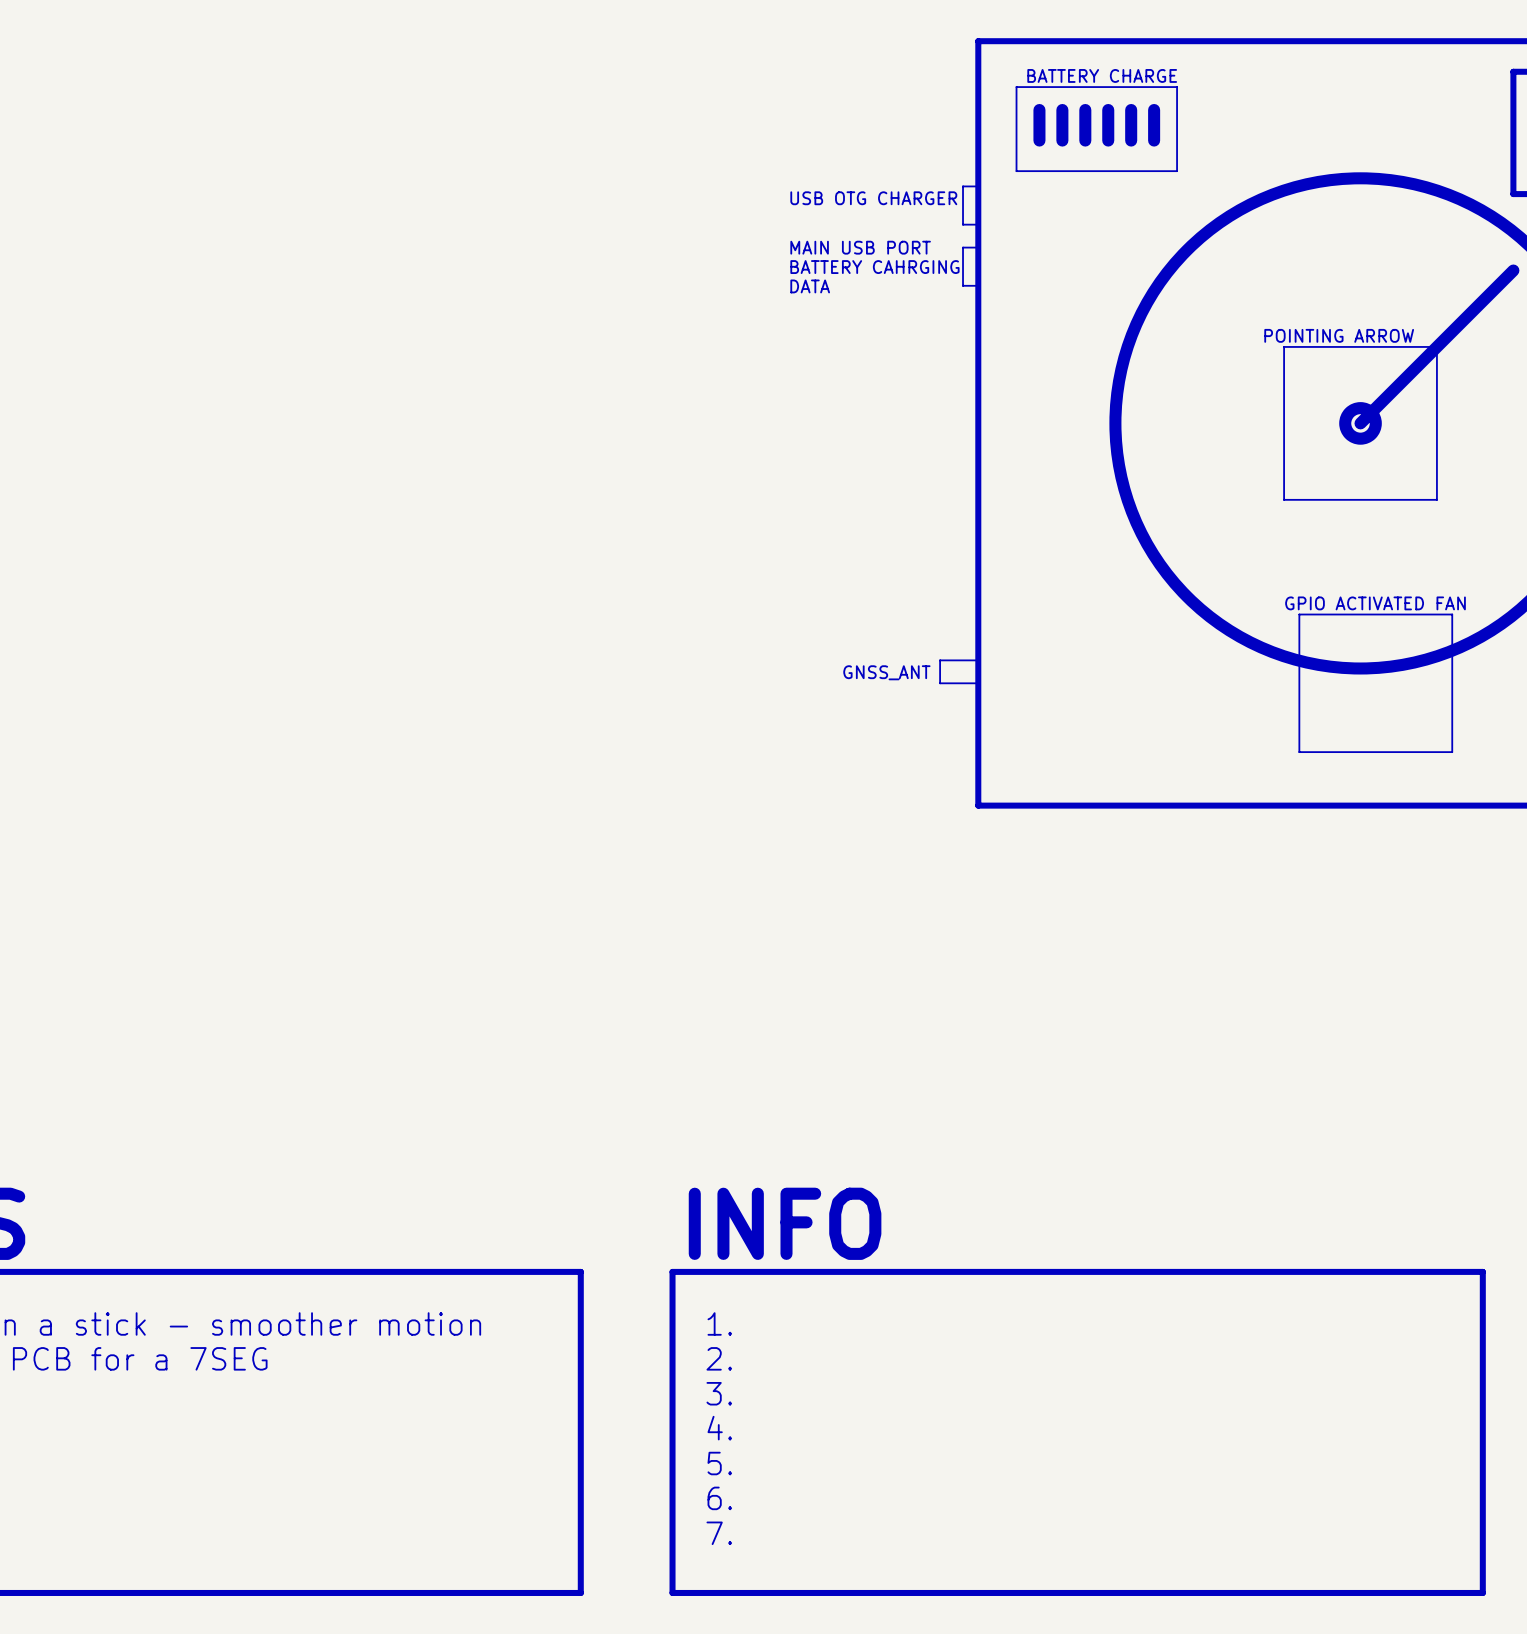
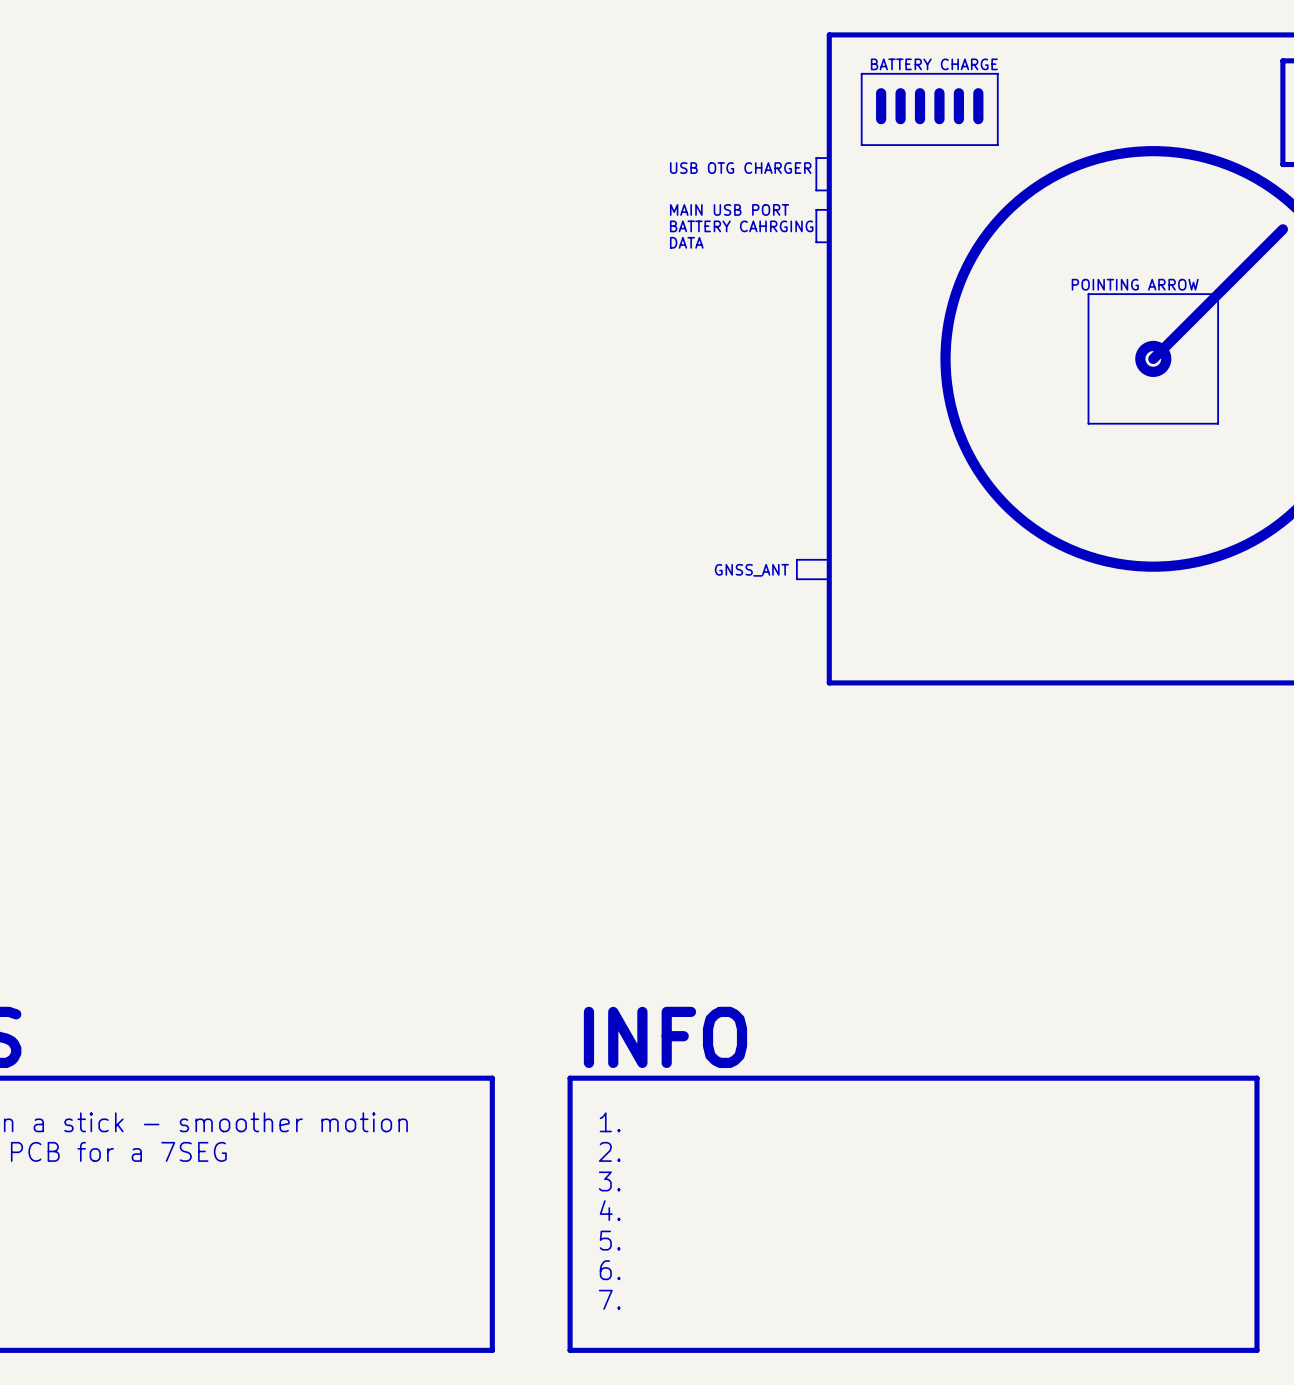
text: GPIO ACTIVATED FAN (1375, 603) -> none
line: (1299, 614) (1452, 614) (1452, 752) (1299, 752) (1299, 614) -> none

